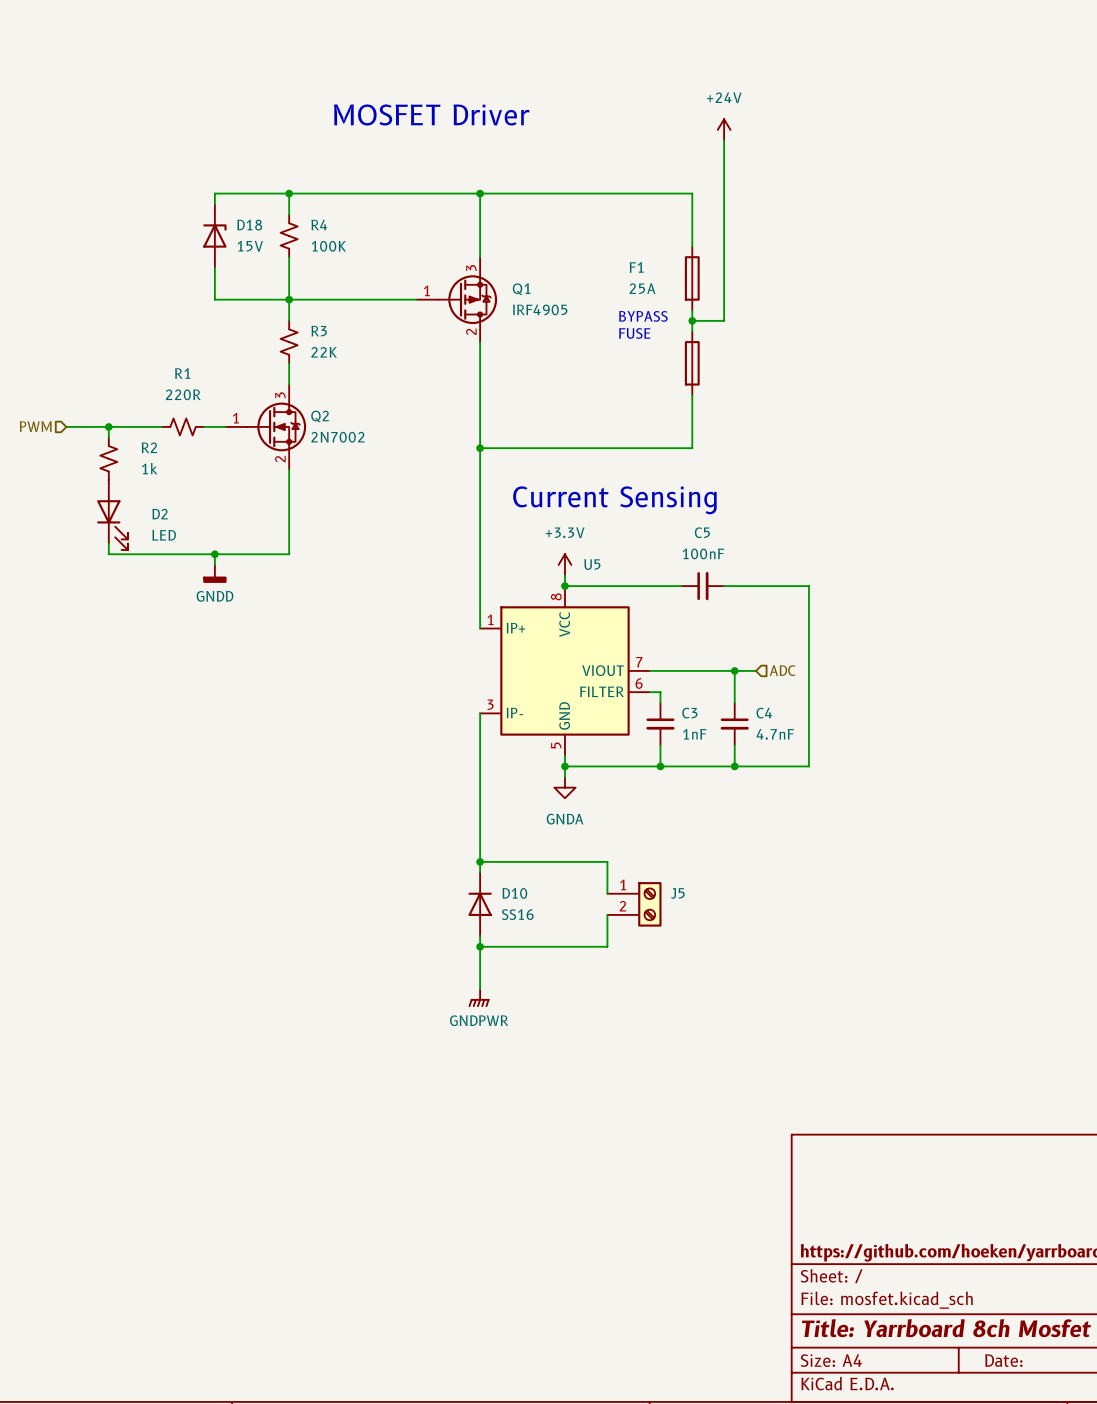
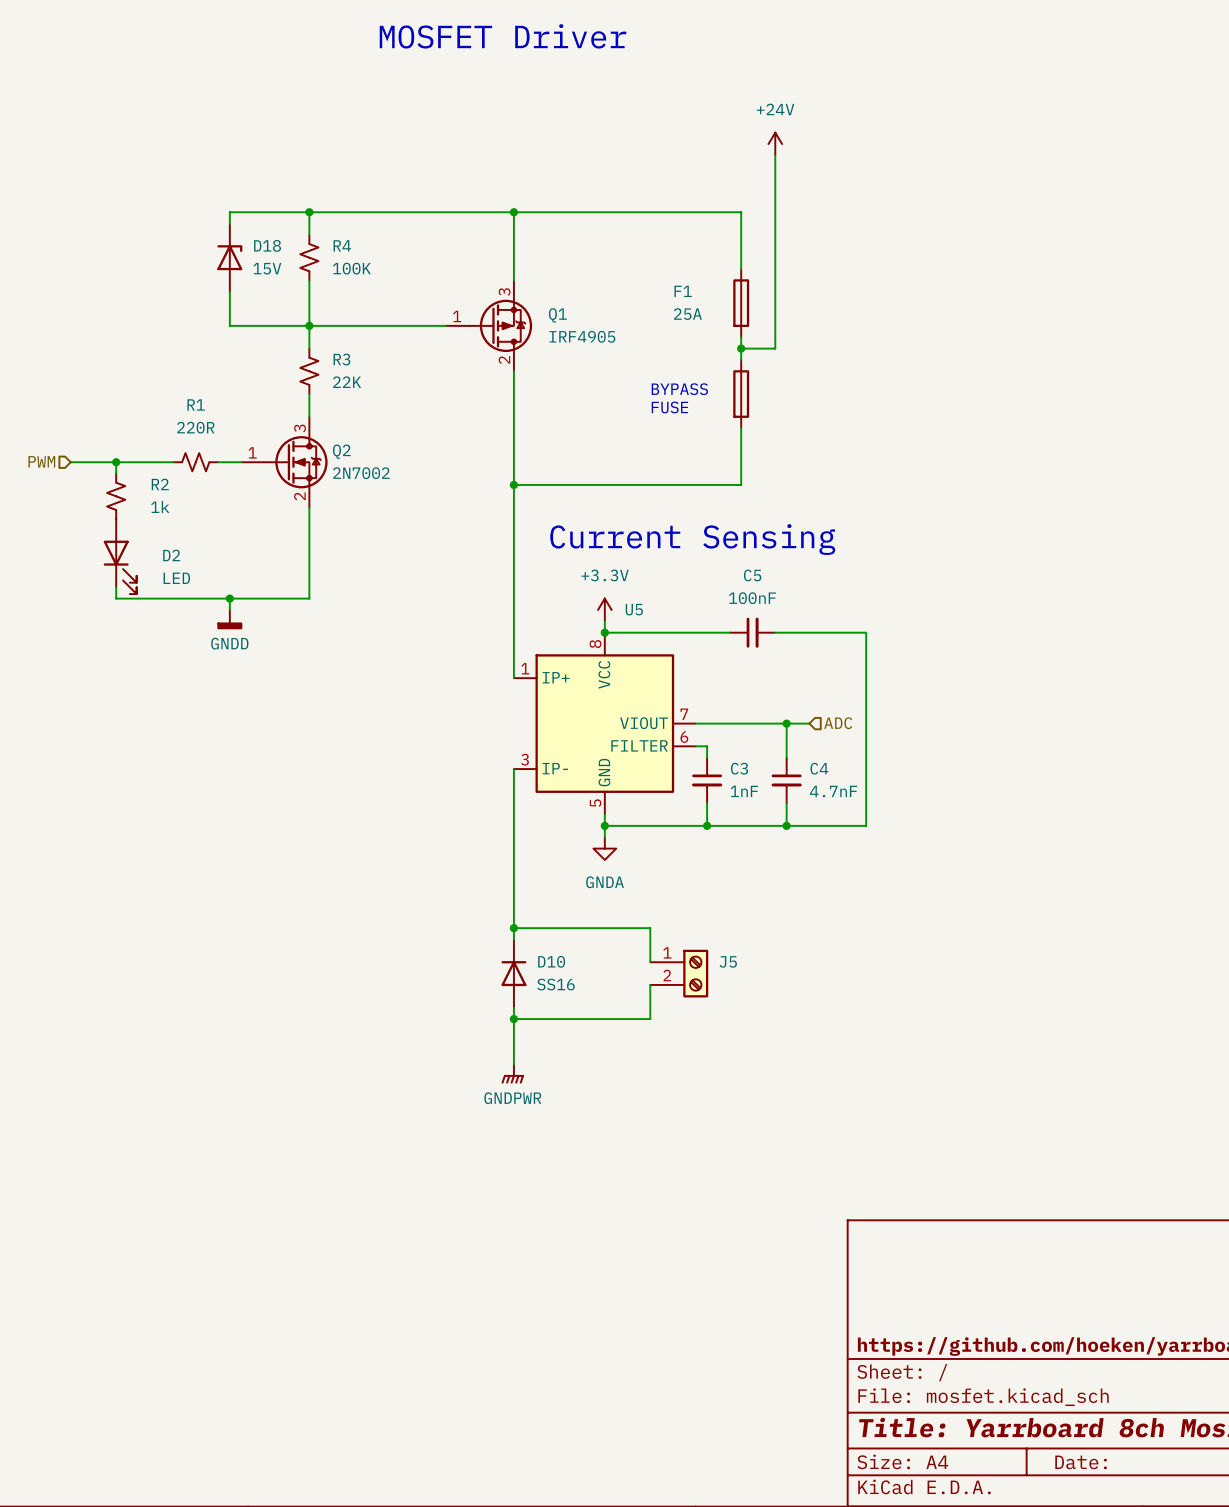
text position: MOSFET Driver (431, 114) -> MOSFET Driver (502, 36)
text position: BYPASS (643, 316) -> BYPASS (679, 389)
text position: FUSE (634, 333) -> FUSE (669, 407)

